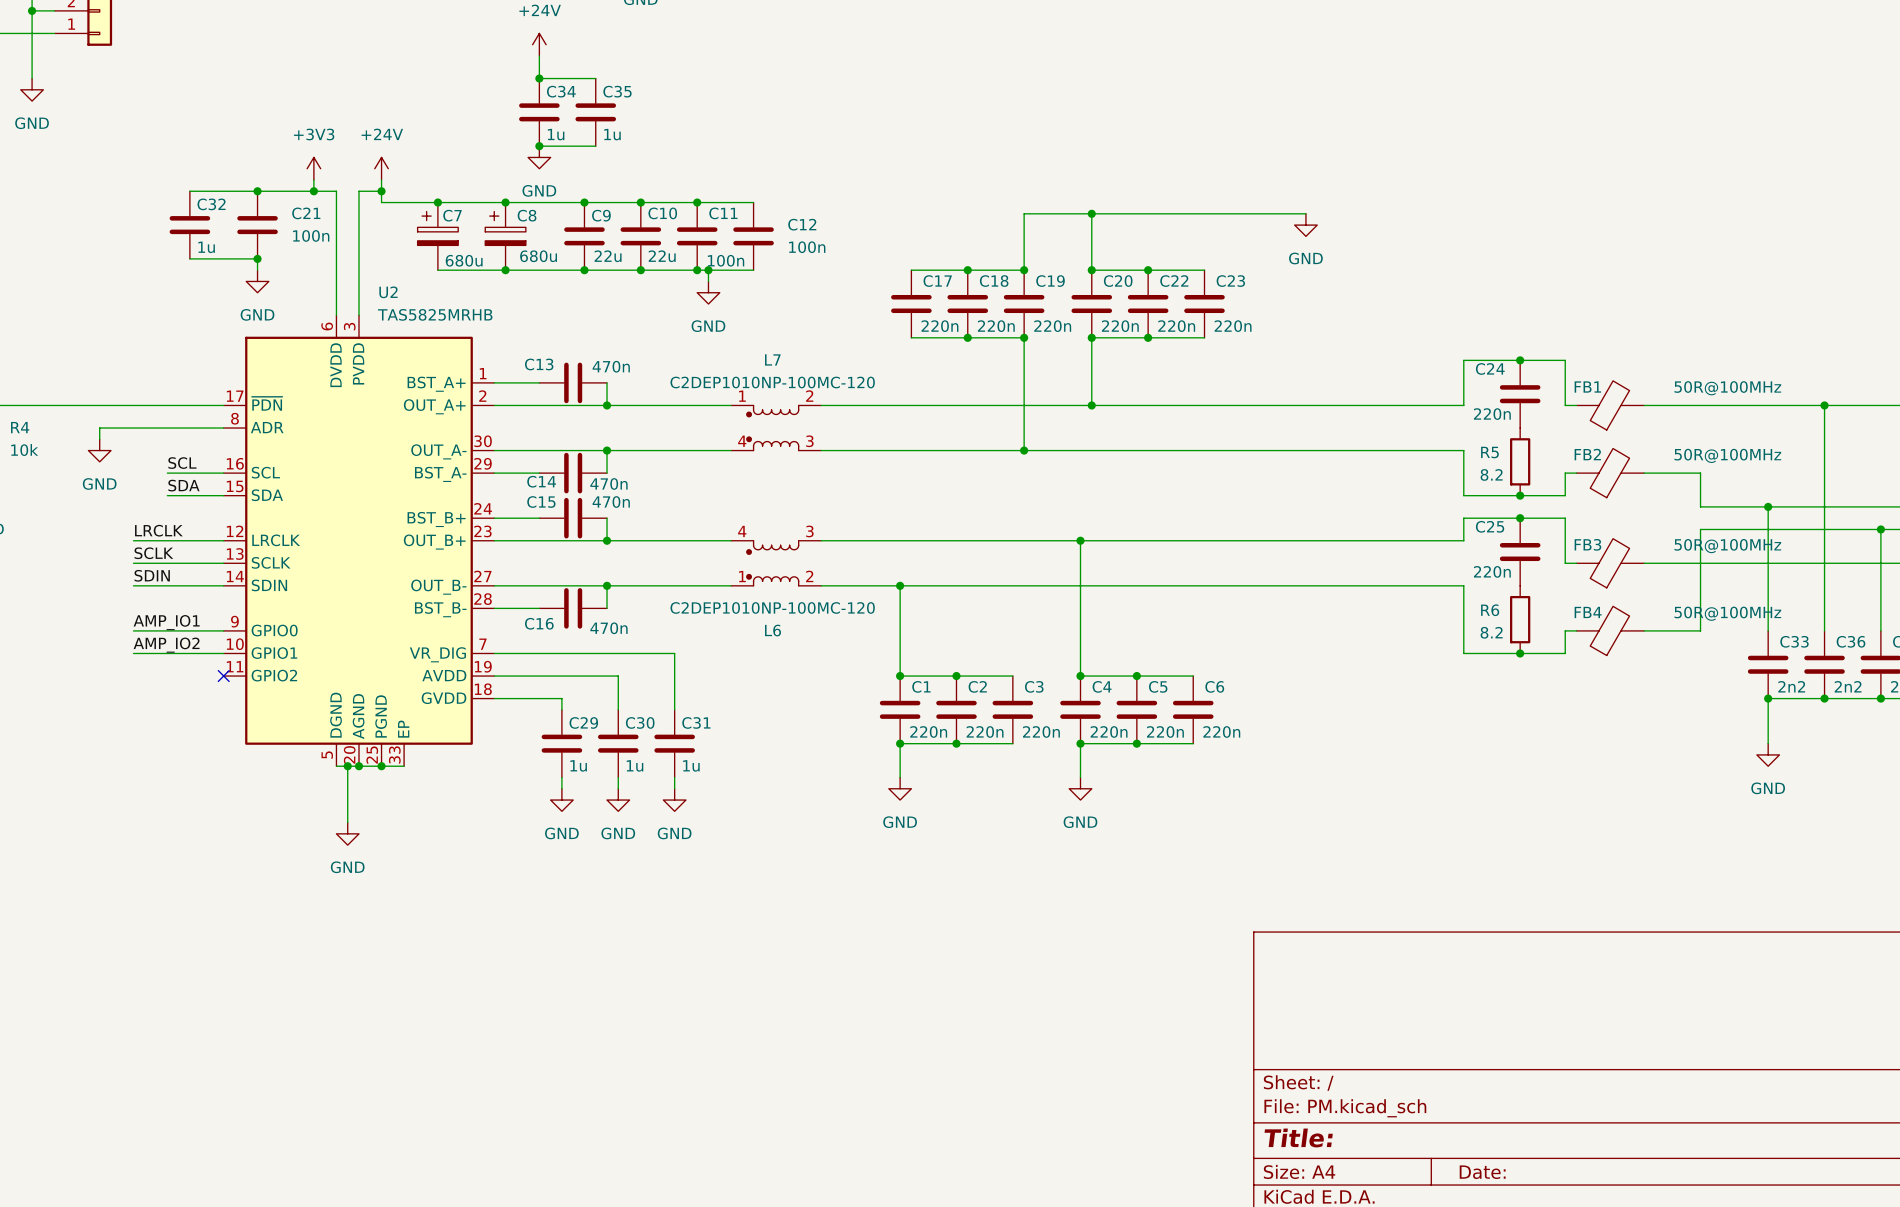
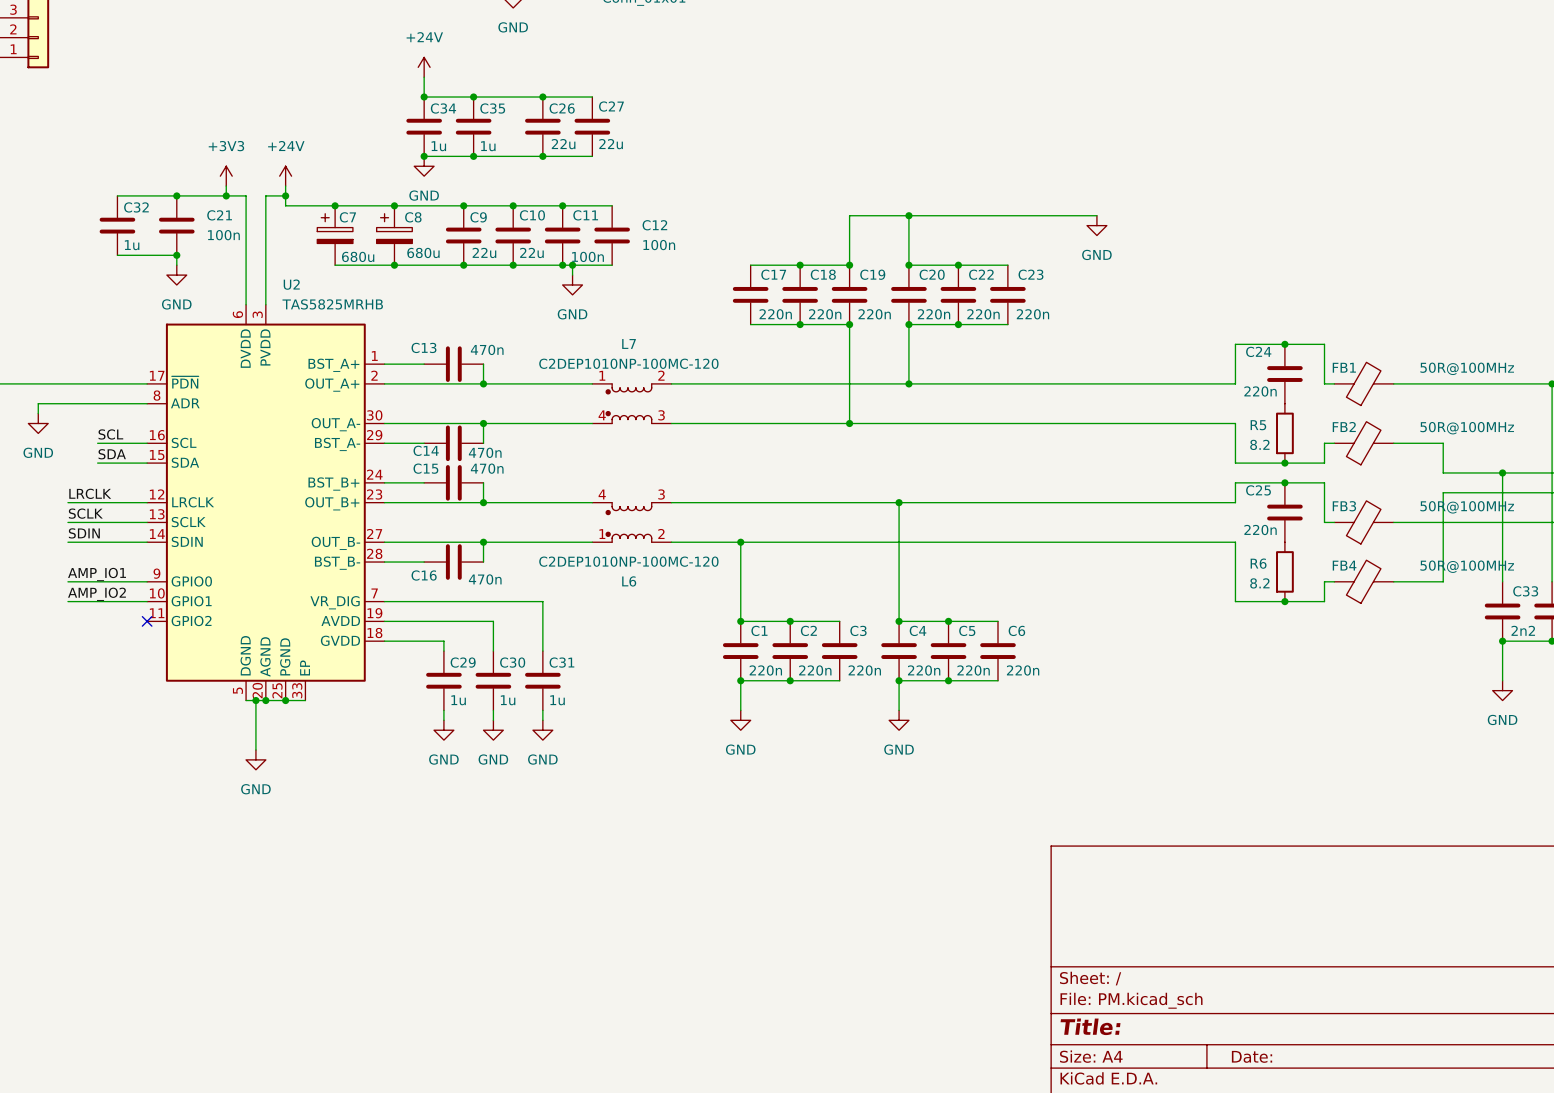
wire: none -> (473, 97) (592, 97)
junction: none -> (473, 97)
junction: none -> (542, 97)
C26: none -> 22u (542, 126)
C27: none -> 22u (592, 126)
wire: none -> (473, 156) (592, 156)
junction: none -> (473, 156)
junction: none -> (542, 156)

